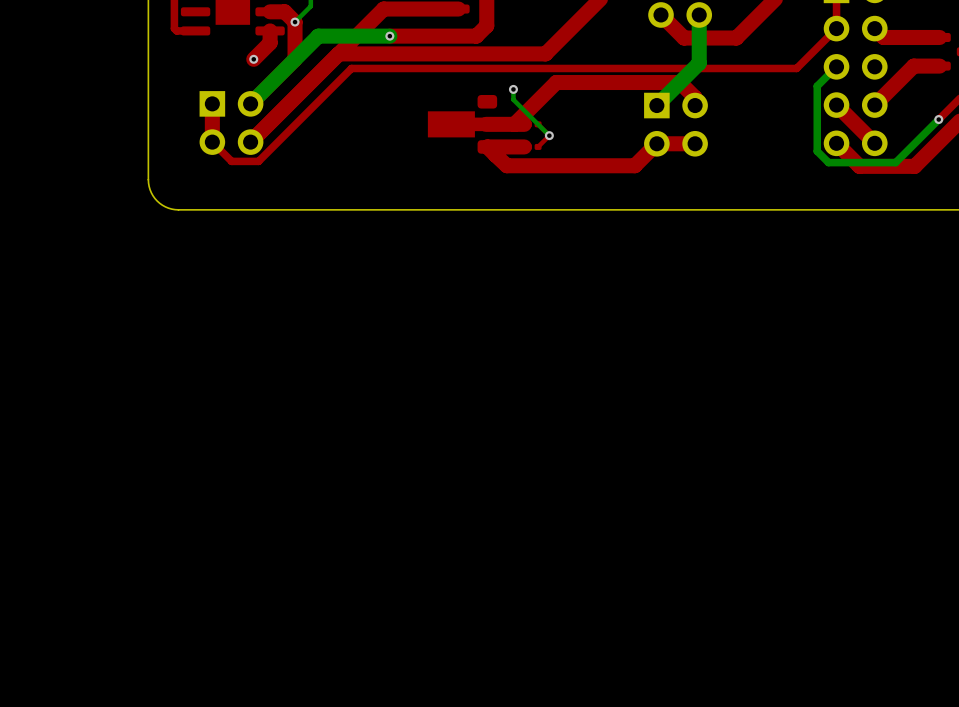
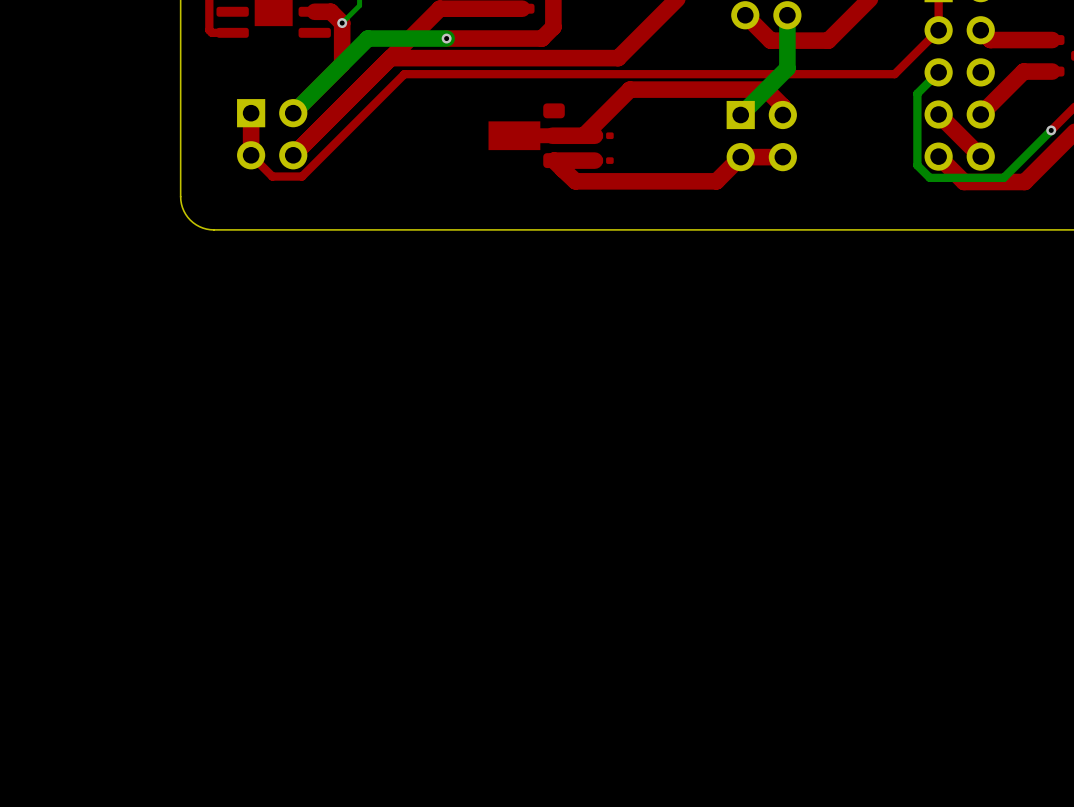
top track: (270, 30) (270, 42) (253, 59) -> none
via: (253, 59) -> none
bottom track: (513, 89) (513, 99) (549, 135) -> none
via: (513, 89) -> none
top track: (549, 135) (538, 146) -> none
via: (549, 135) -> none

